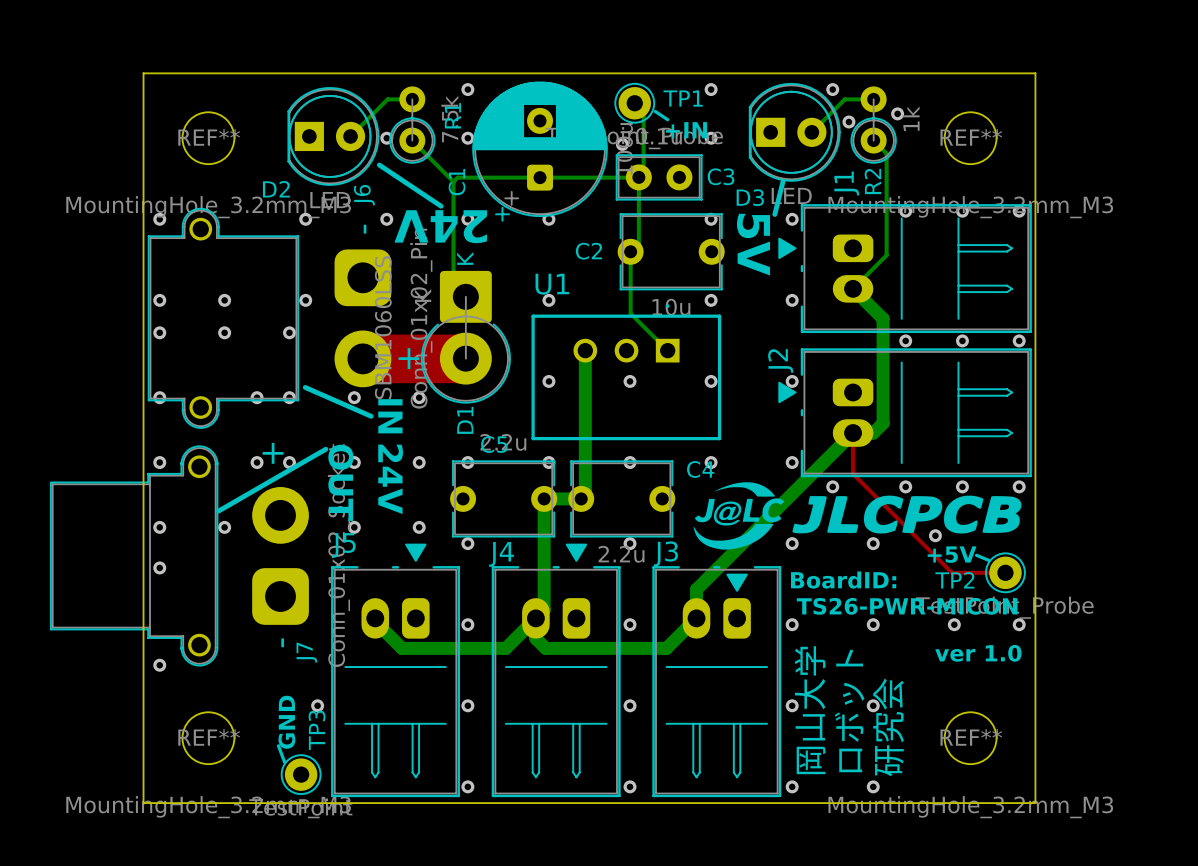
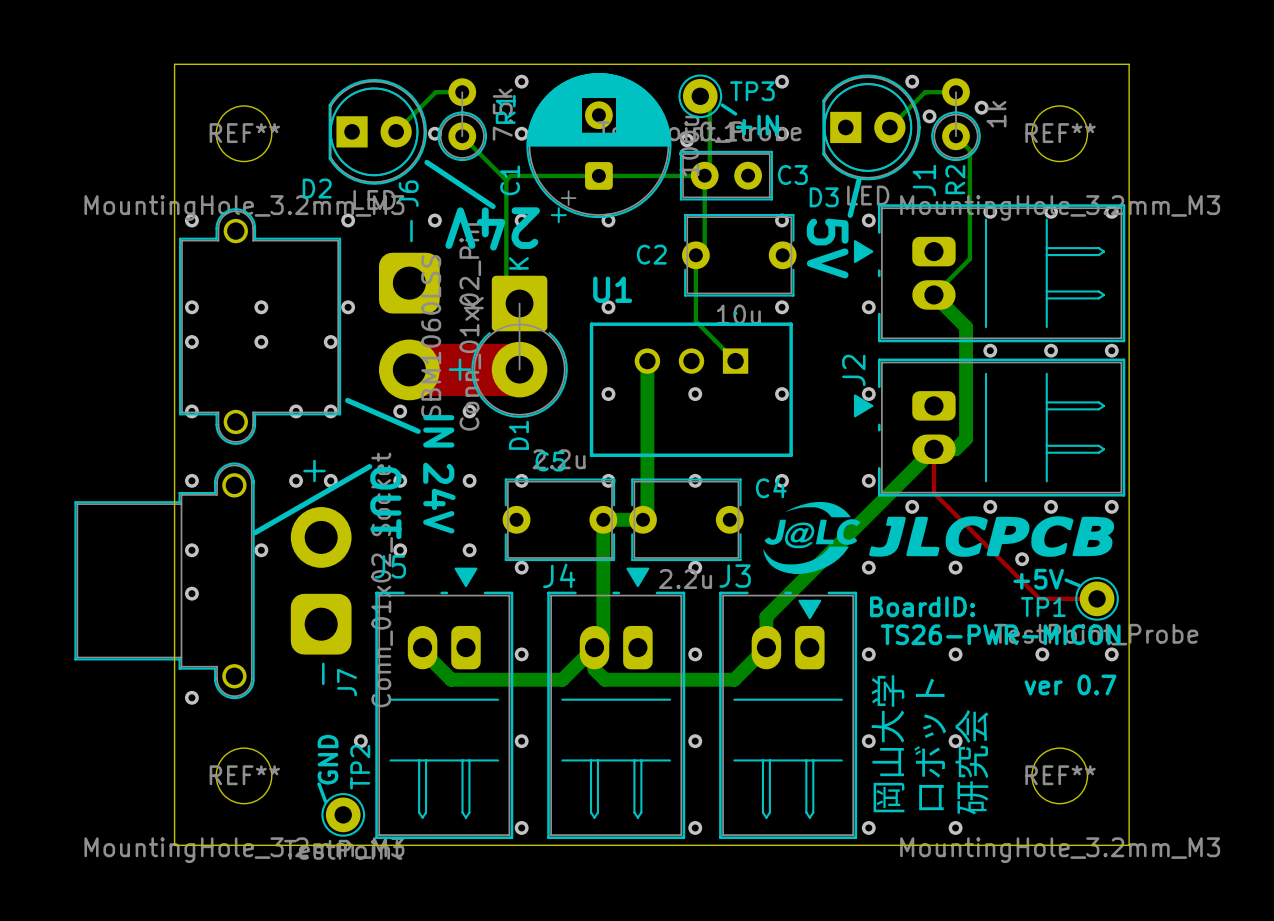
TP1 name: TP1 (683, 98) -> TP3 (752, 91)
TP2 name: TP2 (954, 580) -> TP1 (1043, 607)
text: ver 1.0 (978, 653) -> ver 0.7 (1070, 684)
TP3 name: TP3 (317, 730) -> TP2 (360, 767)

